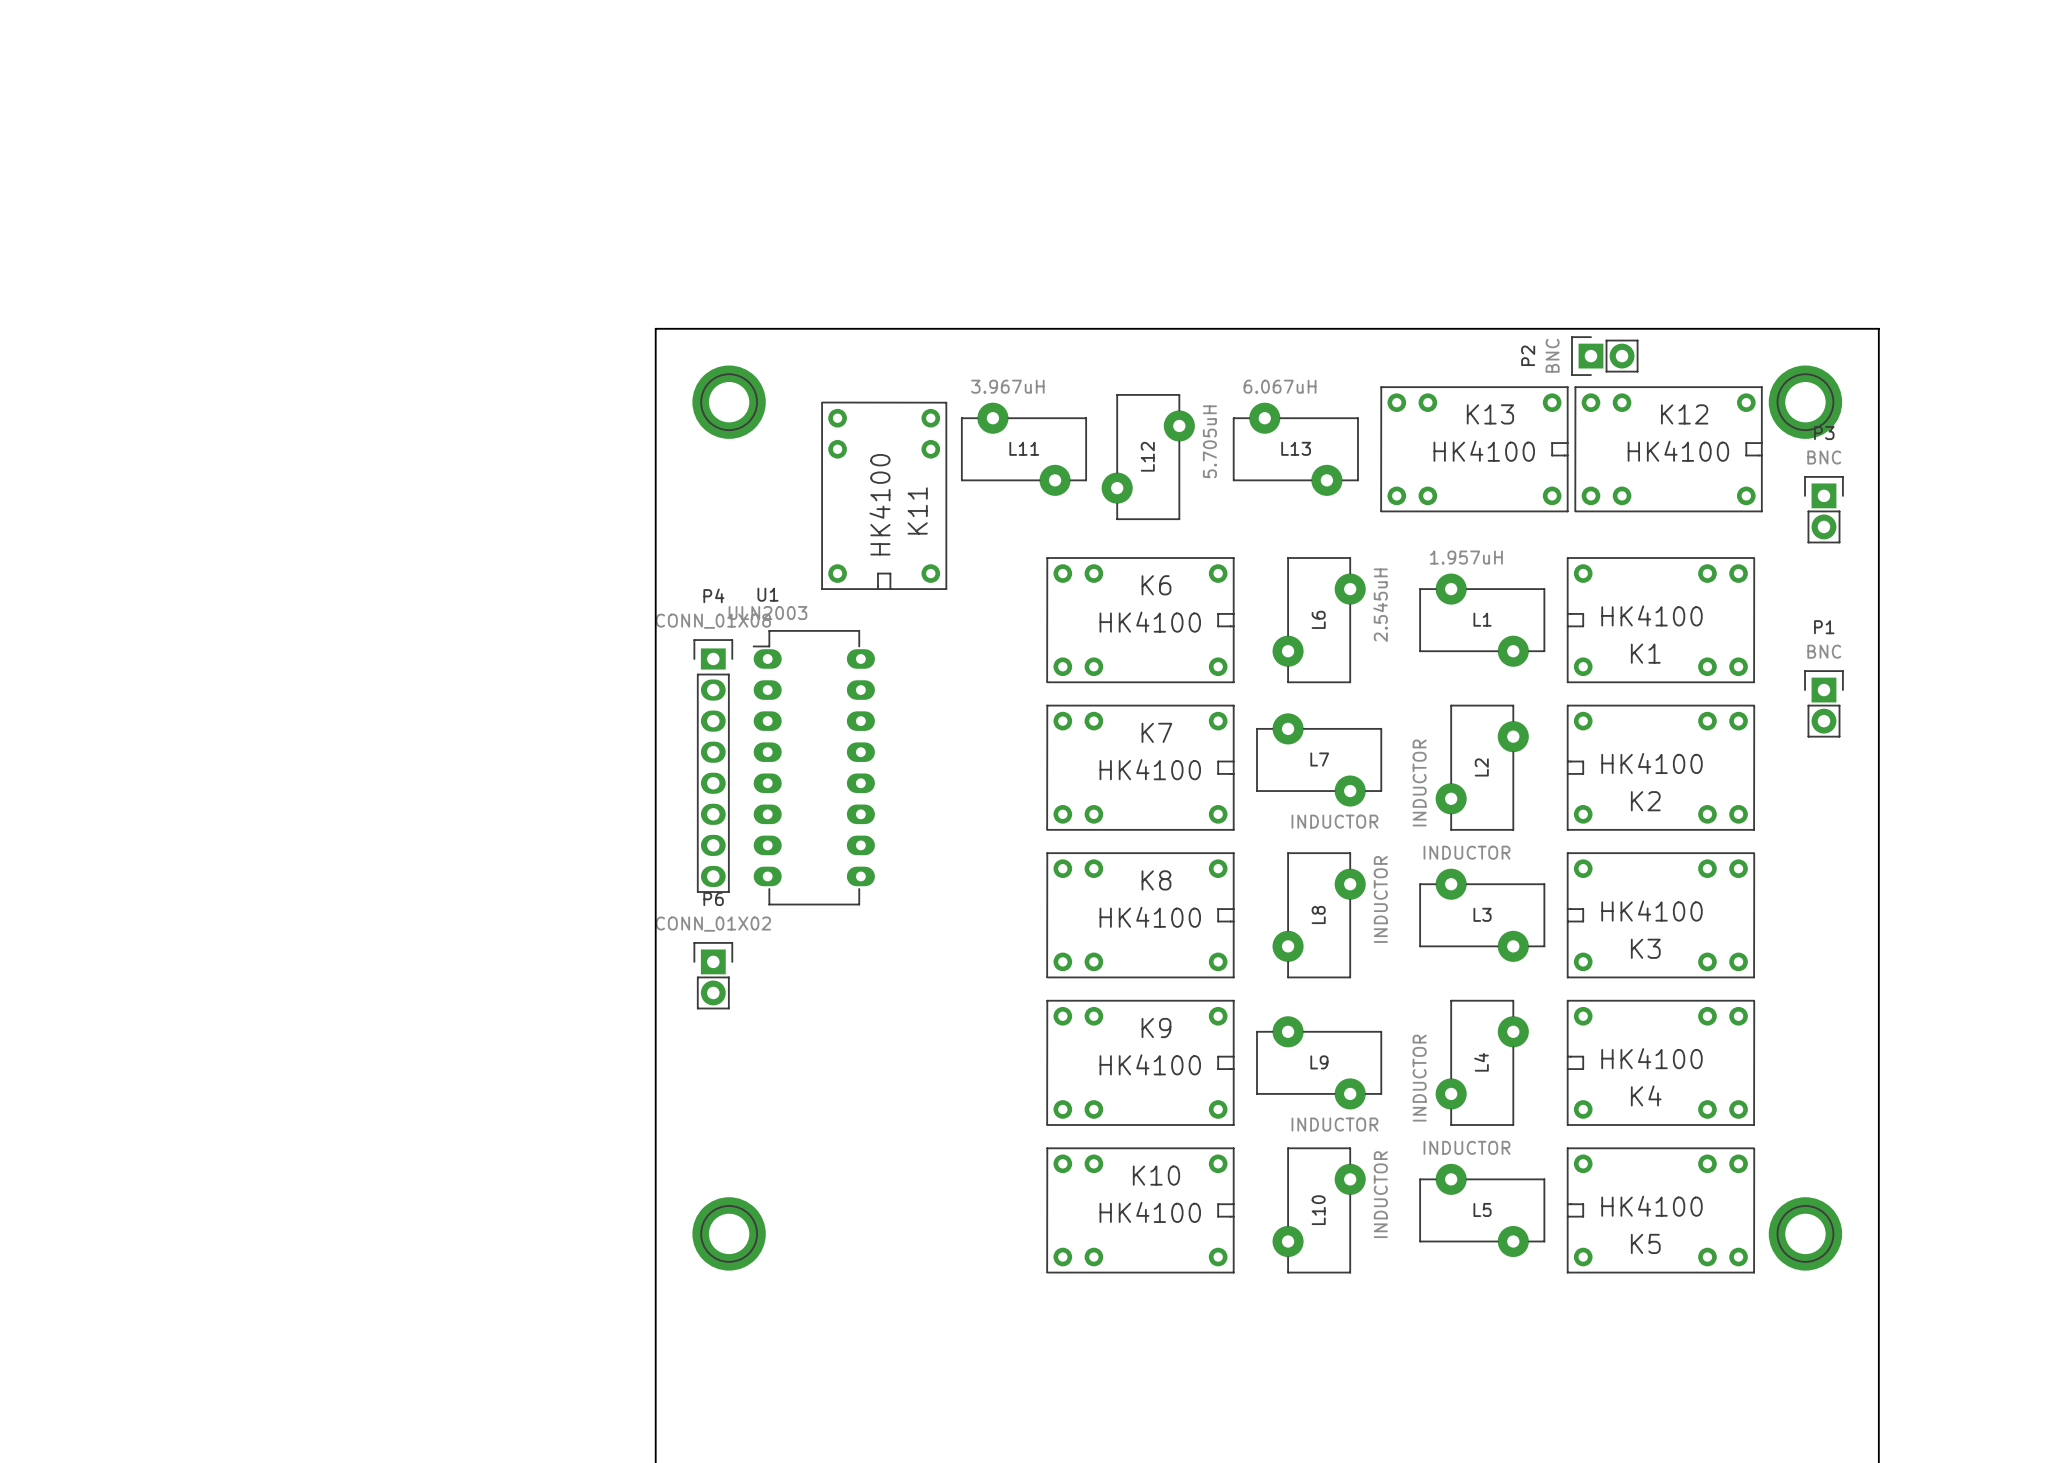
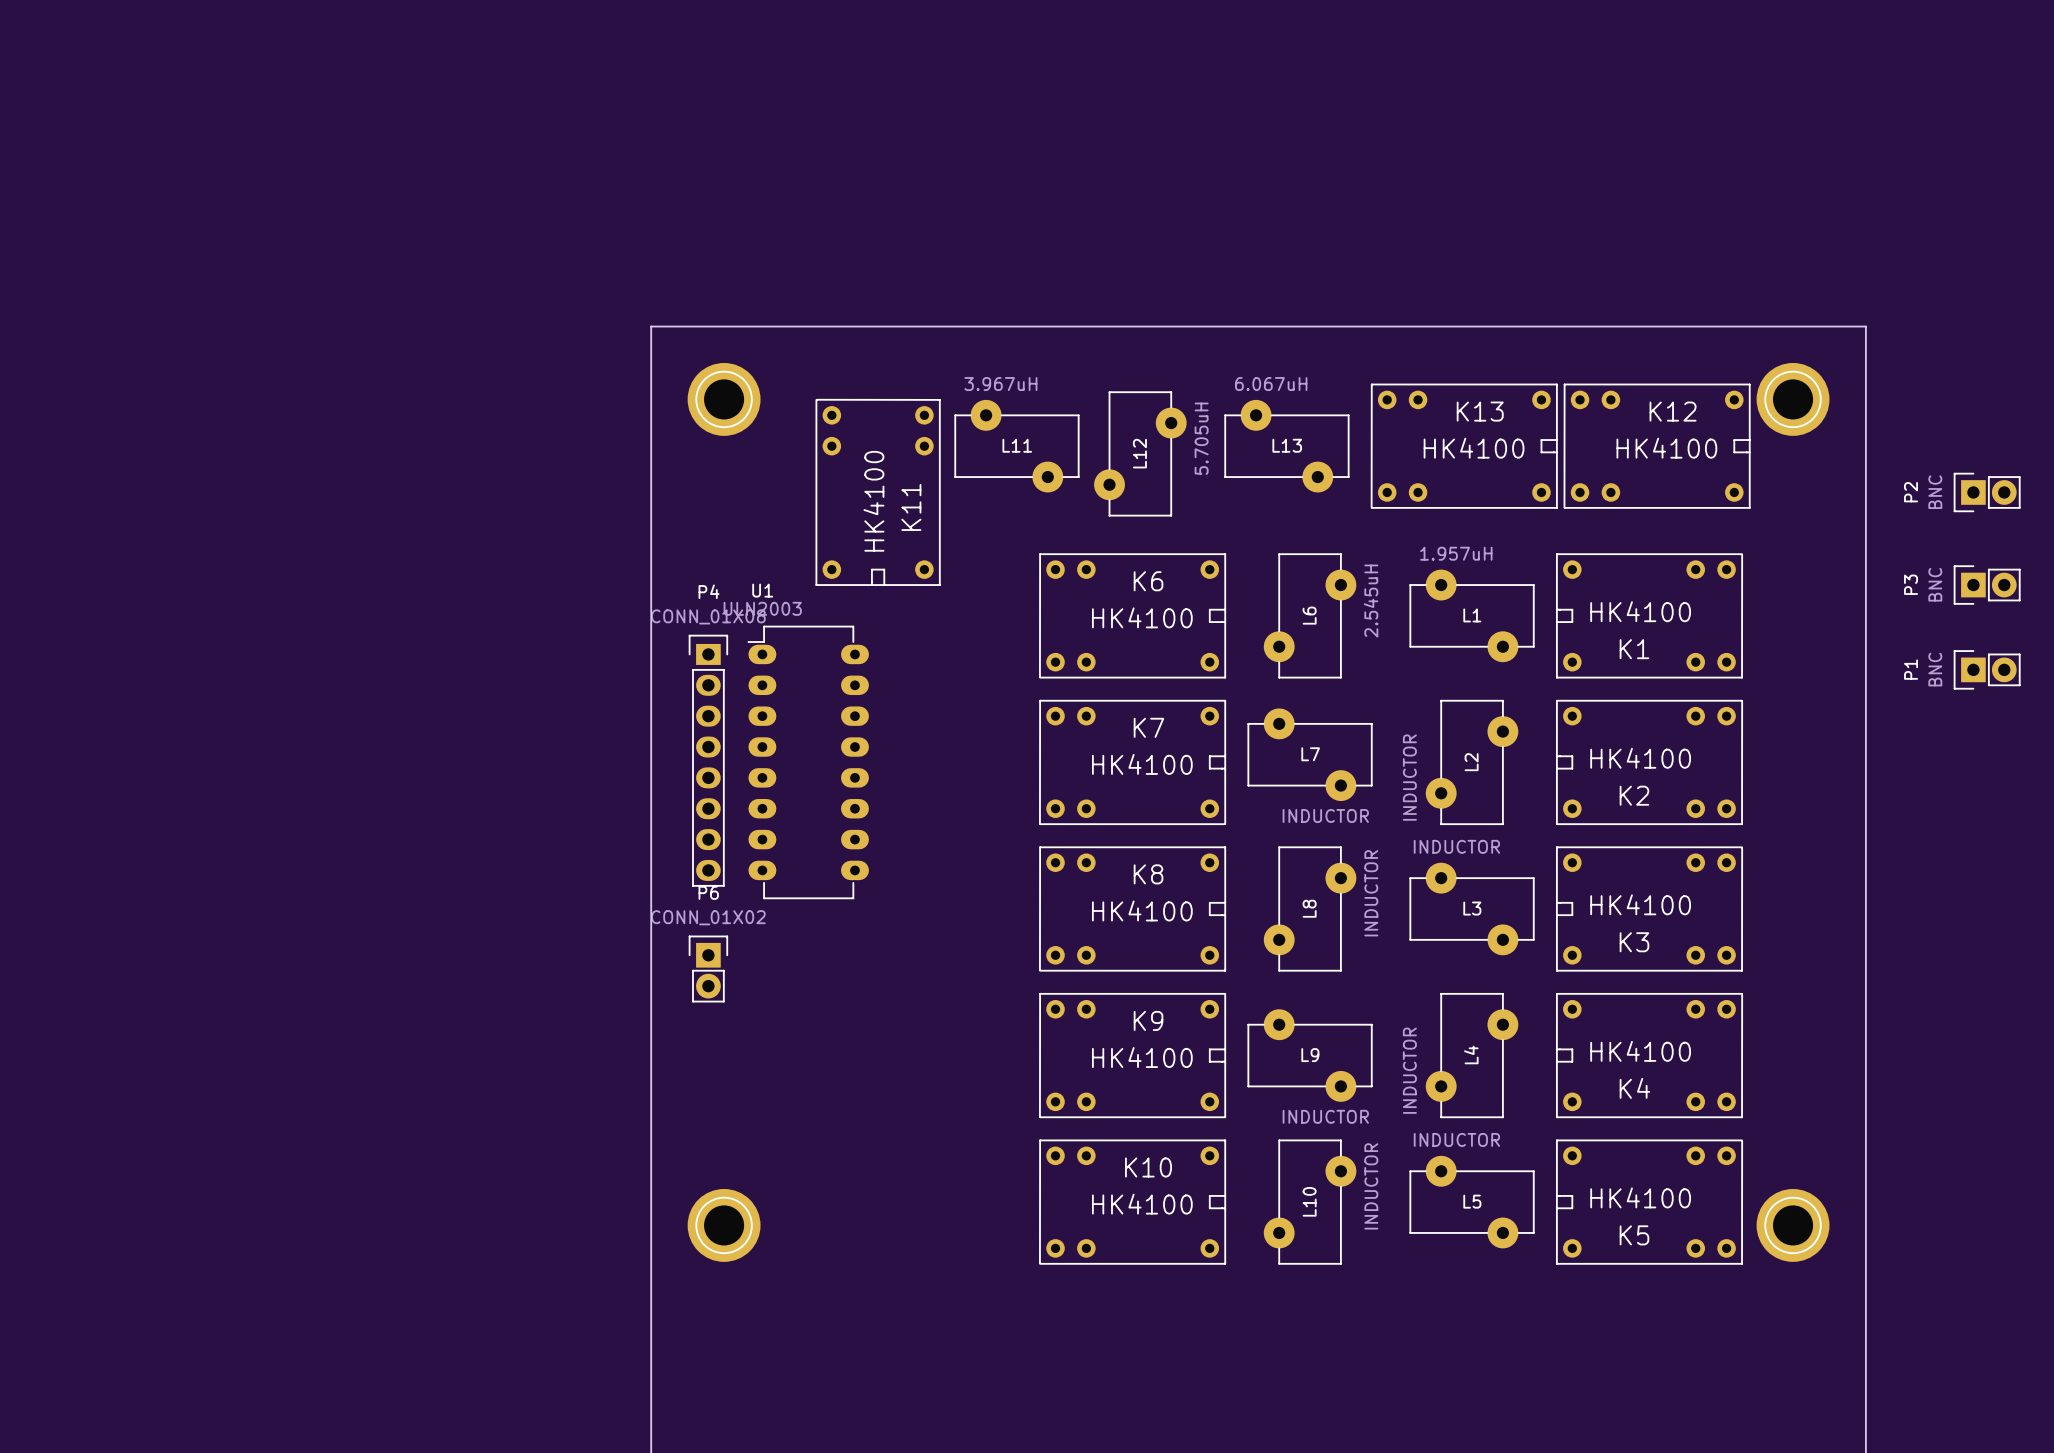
P2 position: (1604, 356) -> (1987, 492)
P3 rotation: 0° (1823, 509) -> 90° counterclockwise (1987, 585)
P3 position: (1823, 509) -> (1987, 585)
P1 rotation: 0° (1823, 703) -> 90° counterclockwise (1987, 669)
P1 position: (1823, 703) -> (1987, 669)

